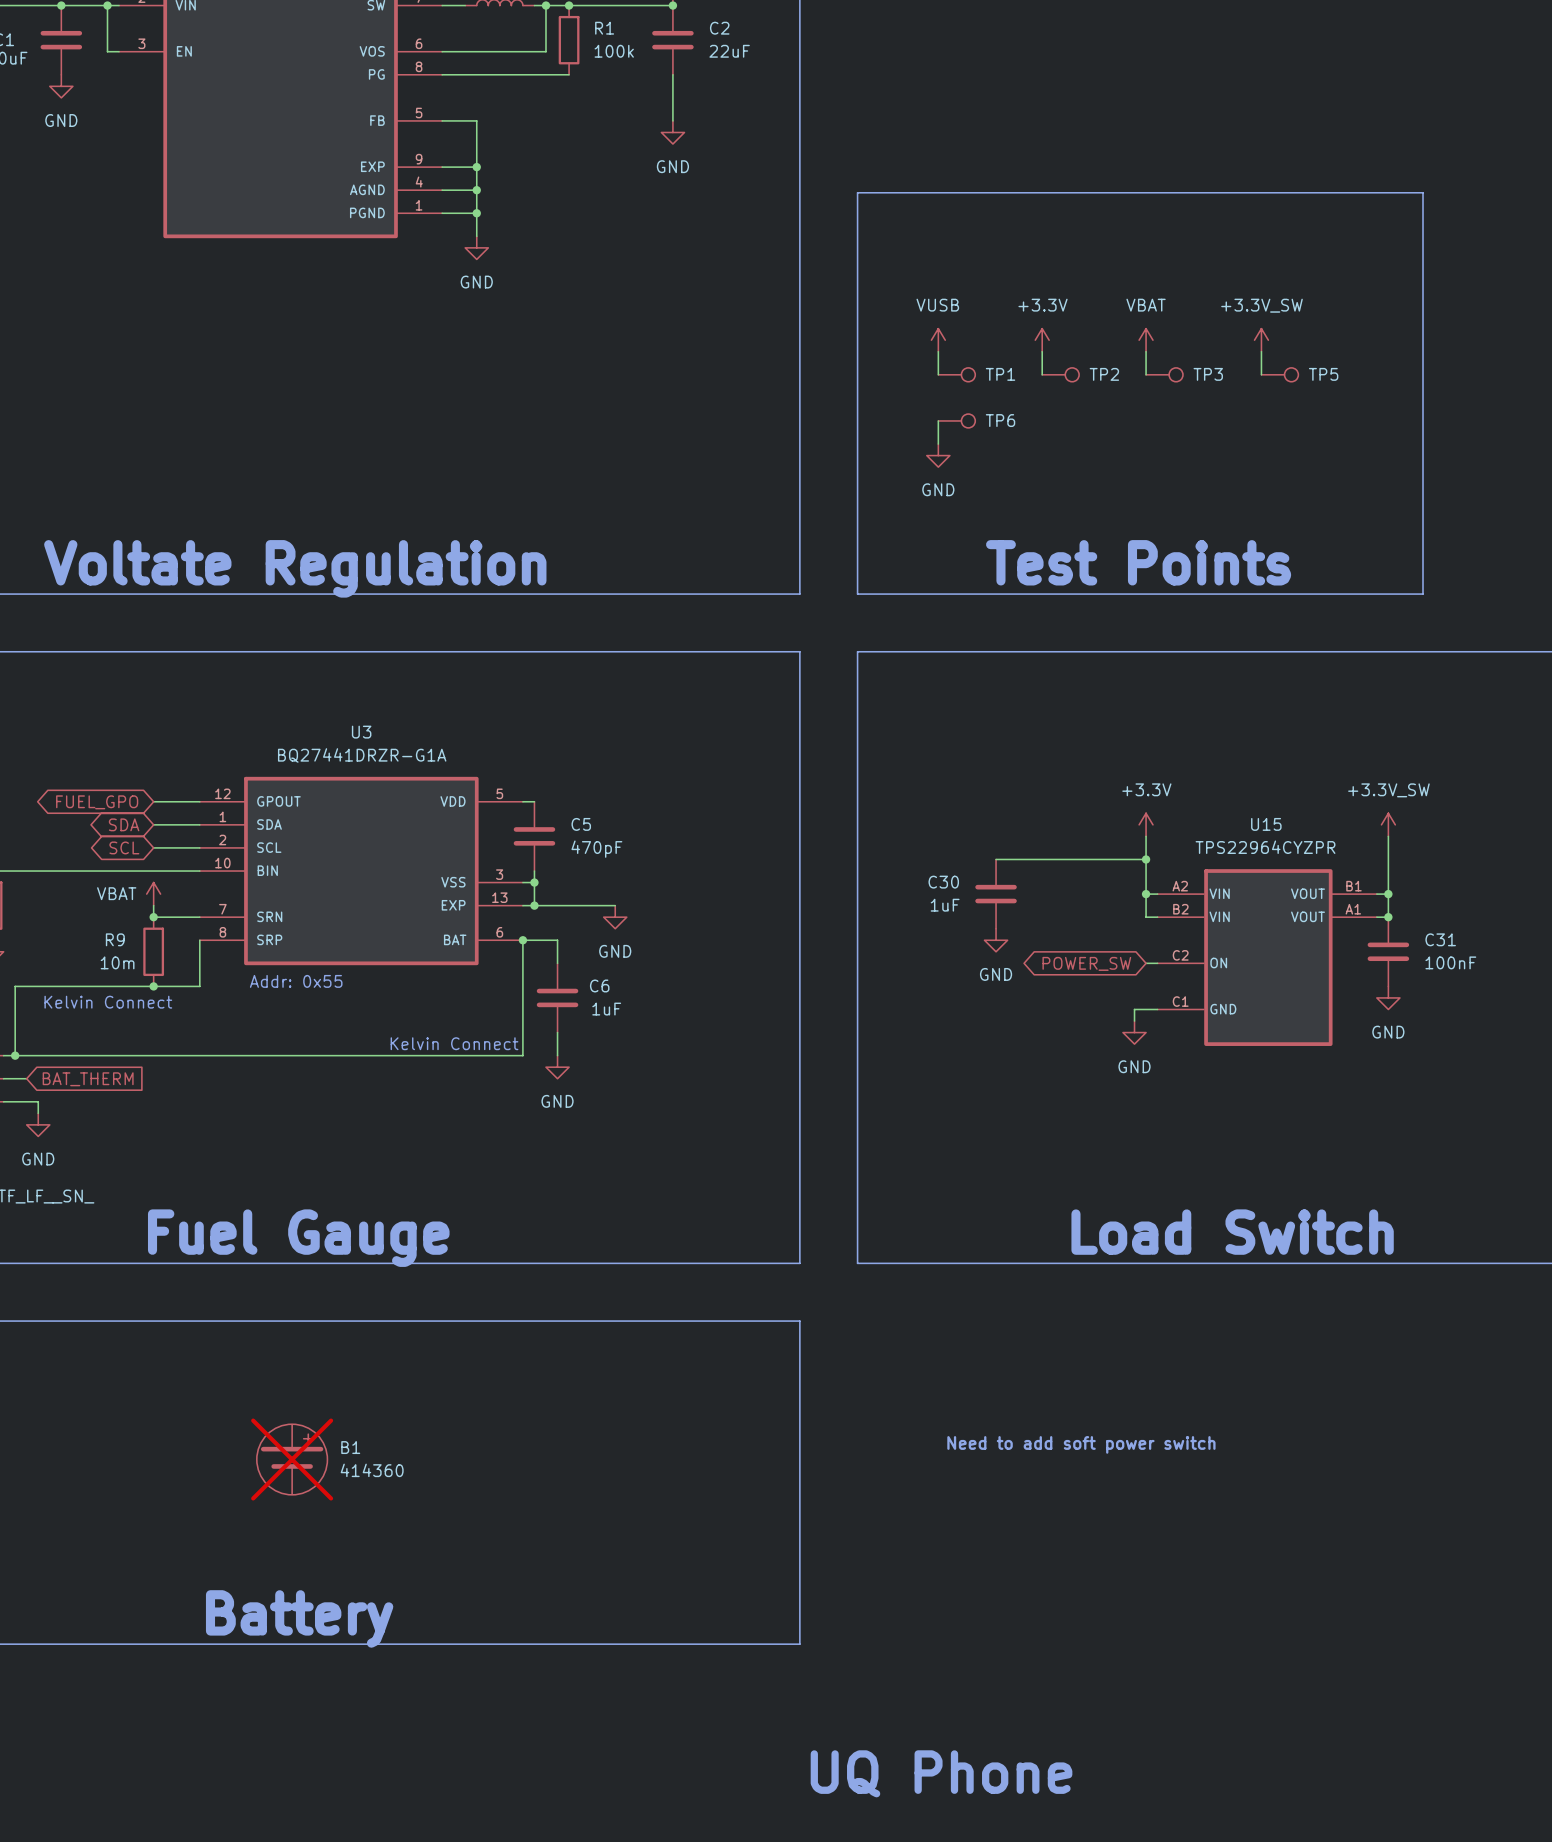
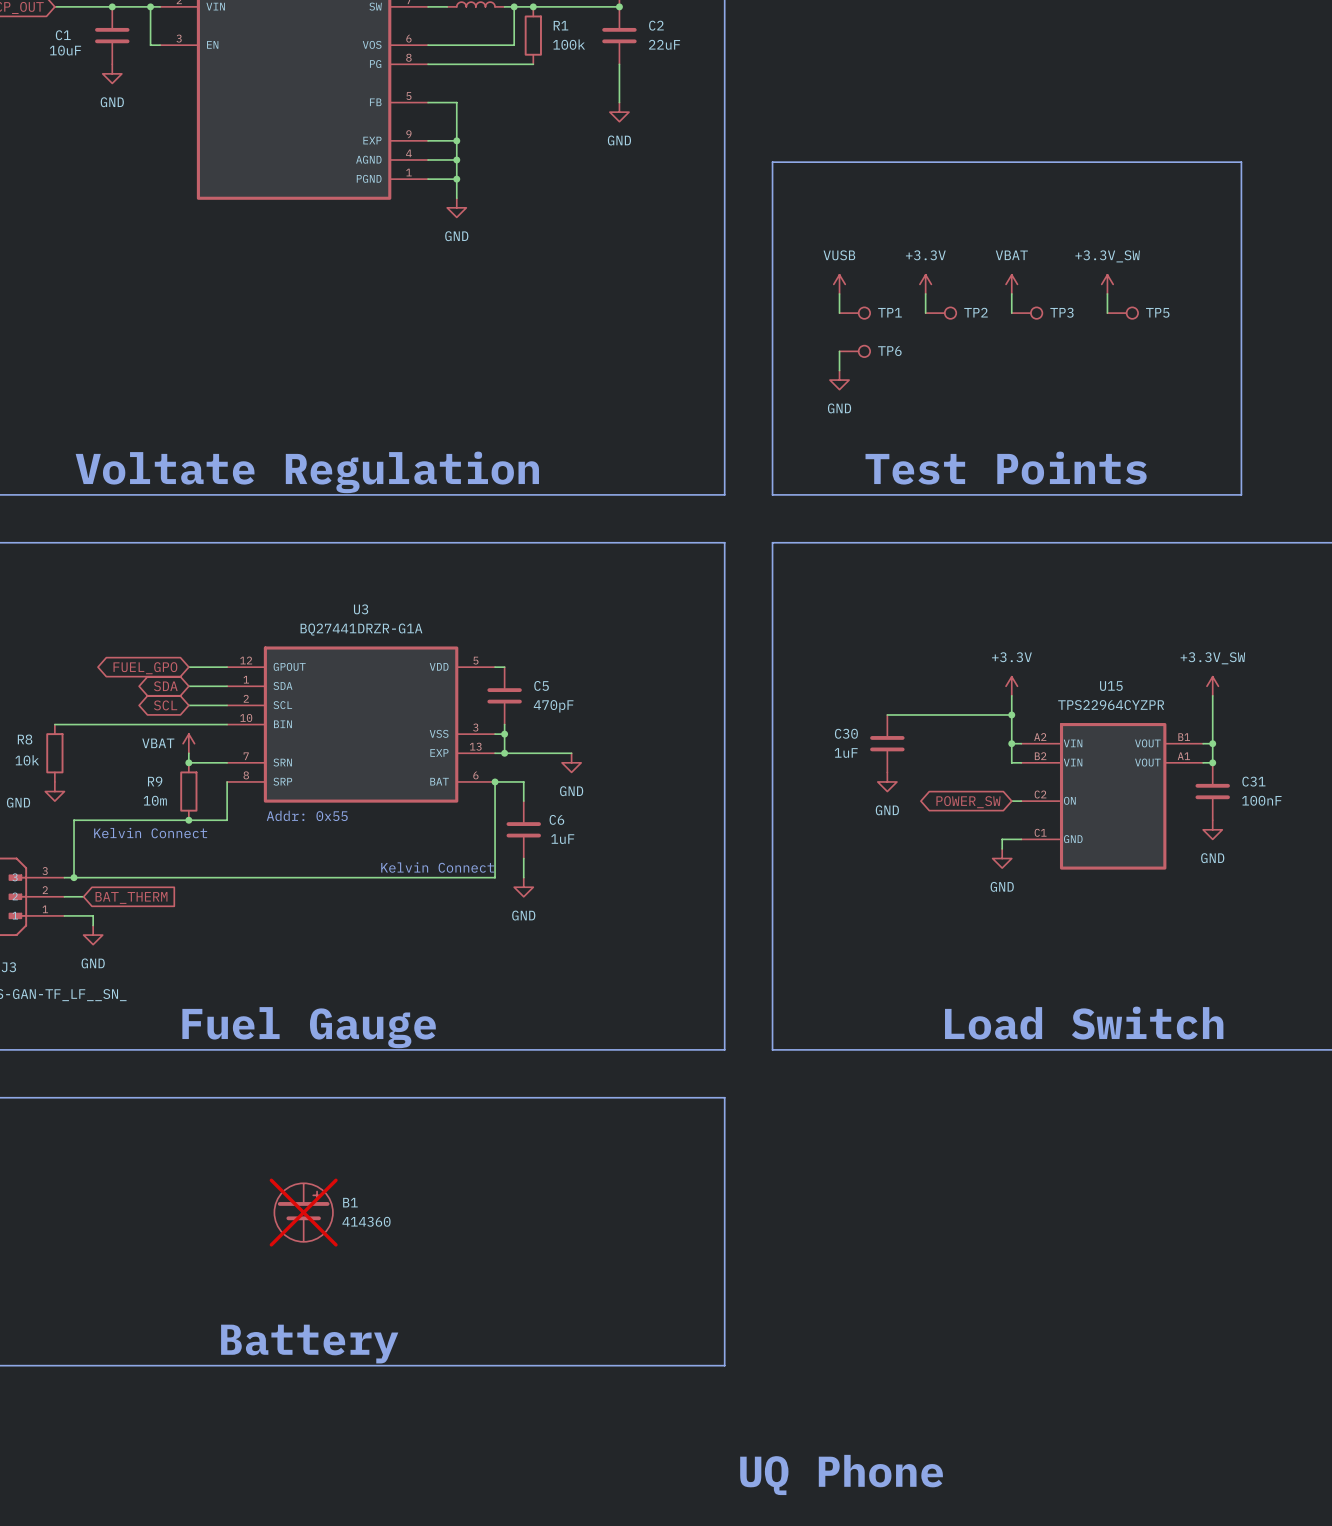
text: Need to add soft power switch (1081, 1444) -> none

